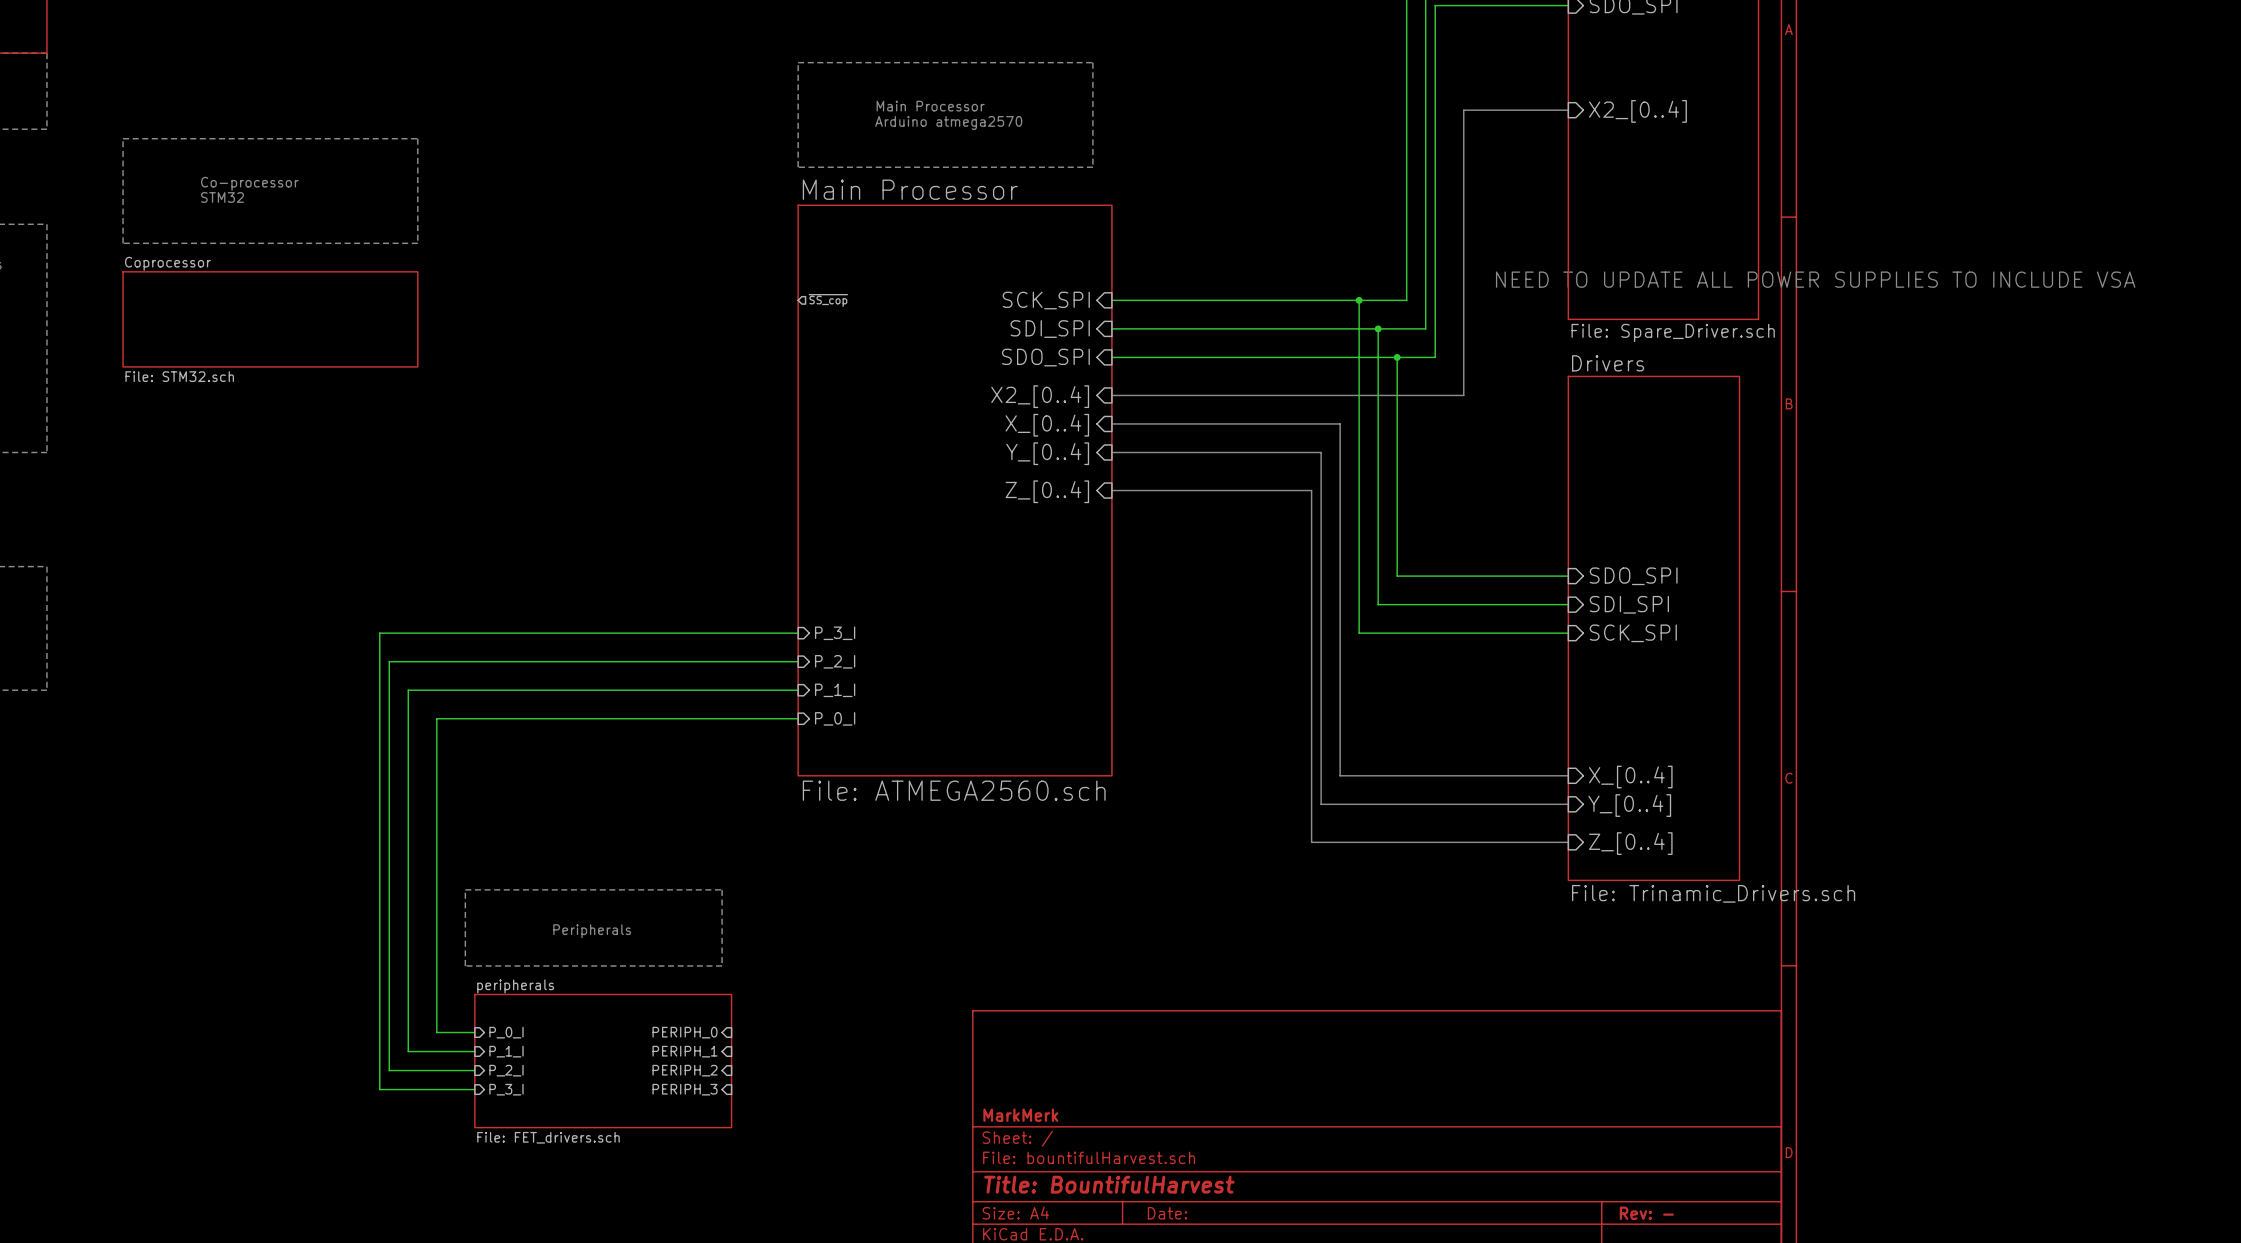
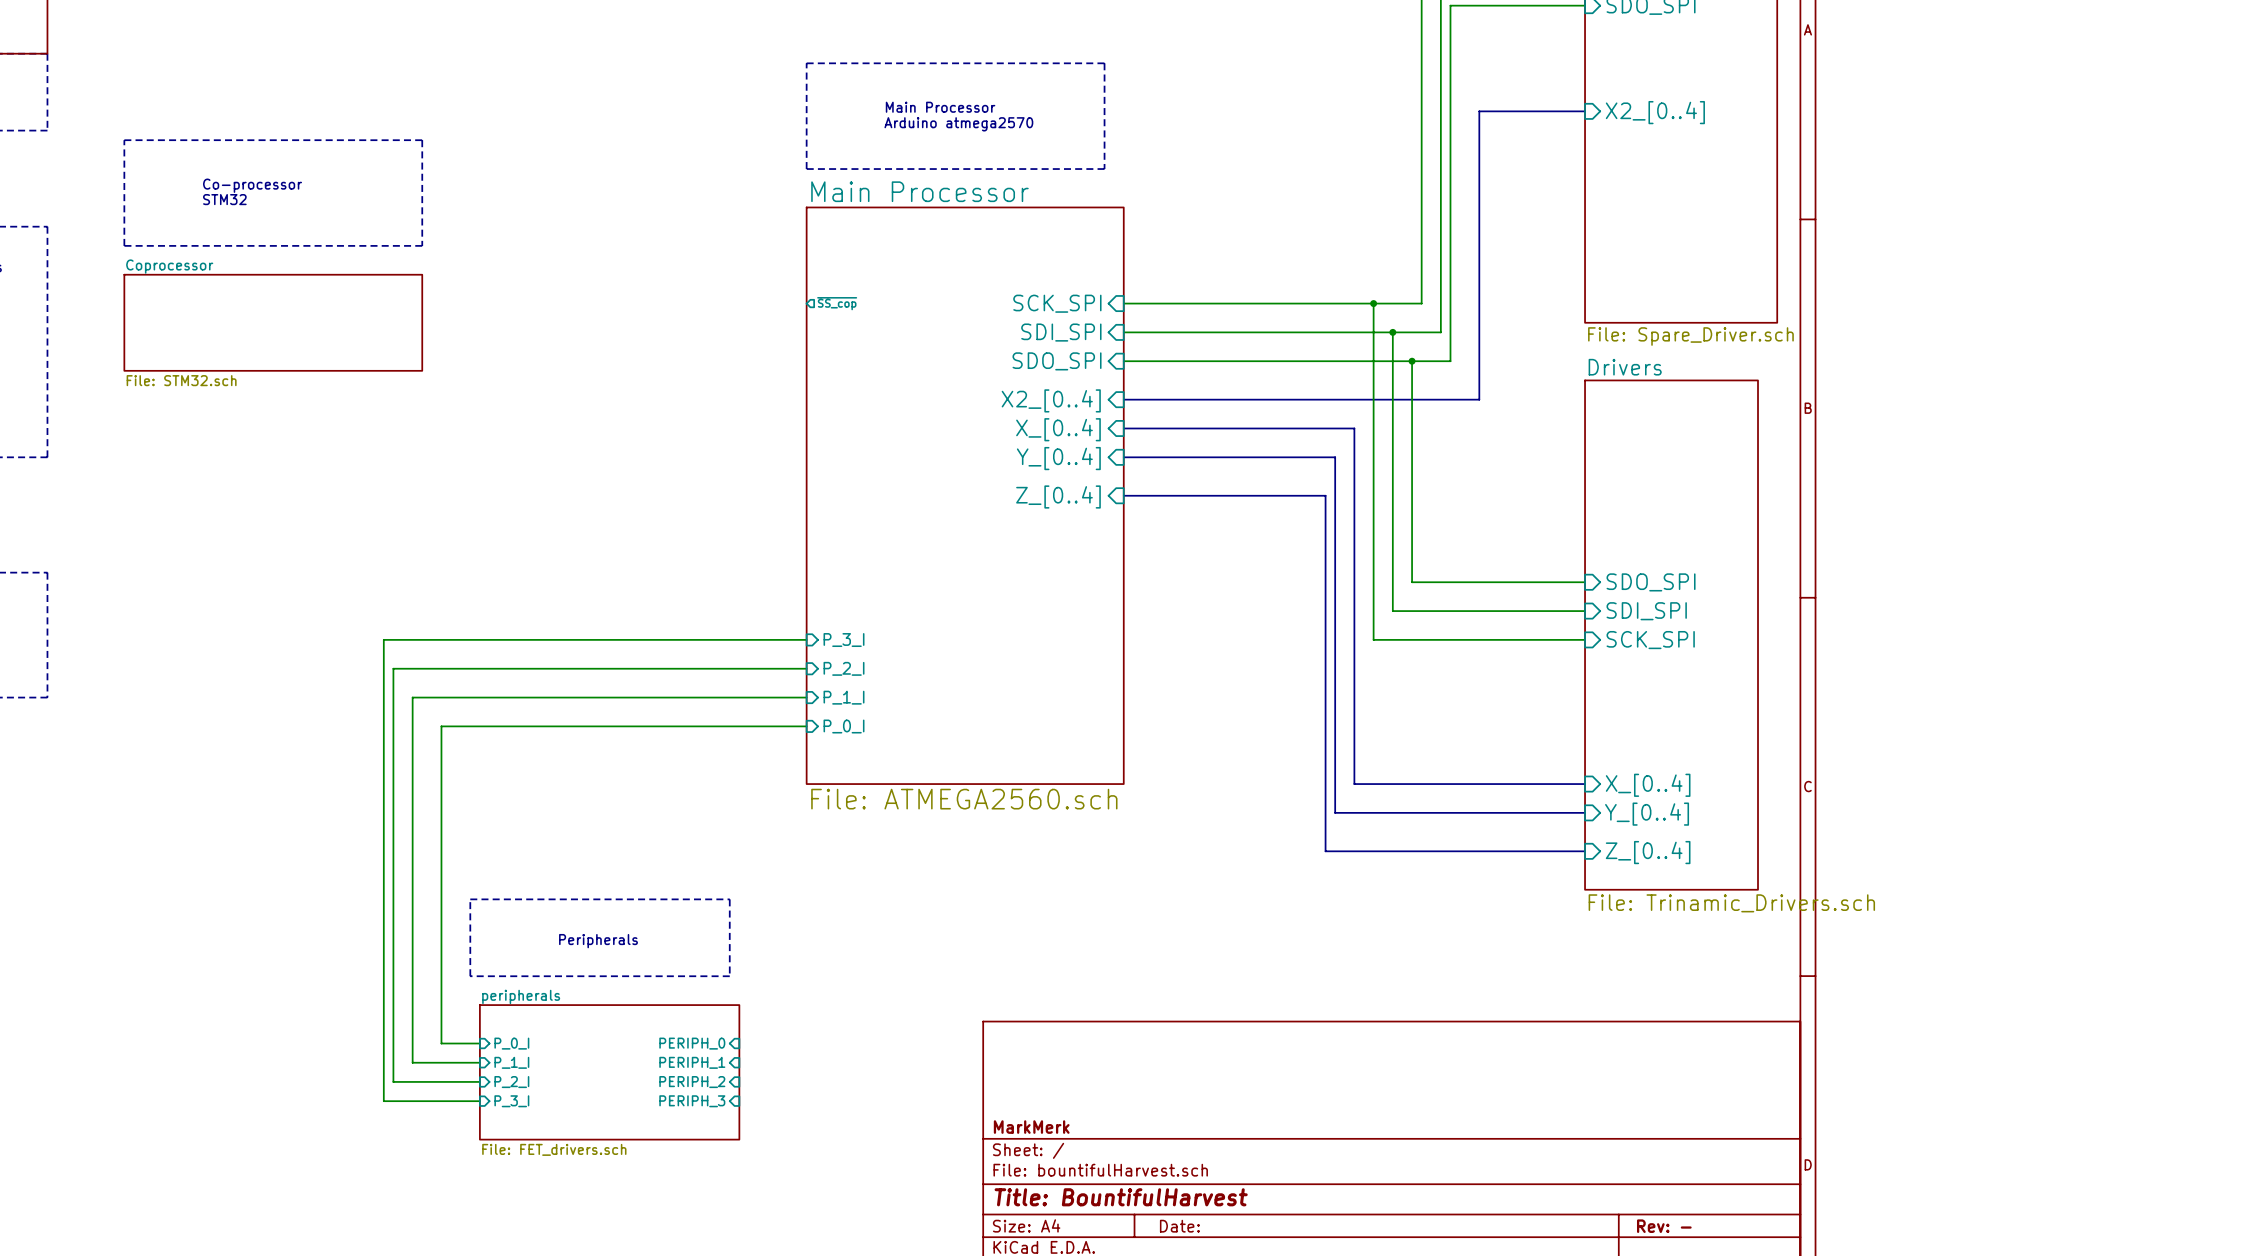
text: NEED TO UPDATE ALL POWER SUPPLIES TO INCLUDE VSA (1815, 279) -> none

